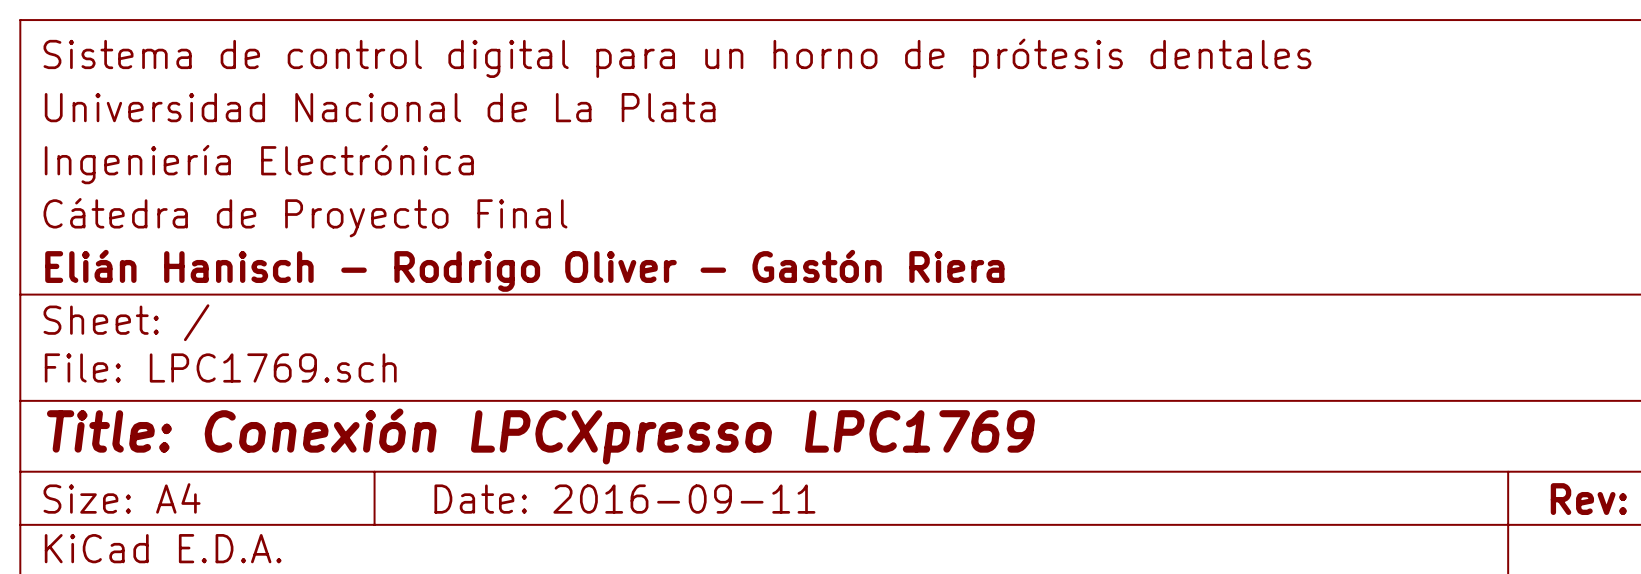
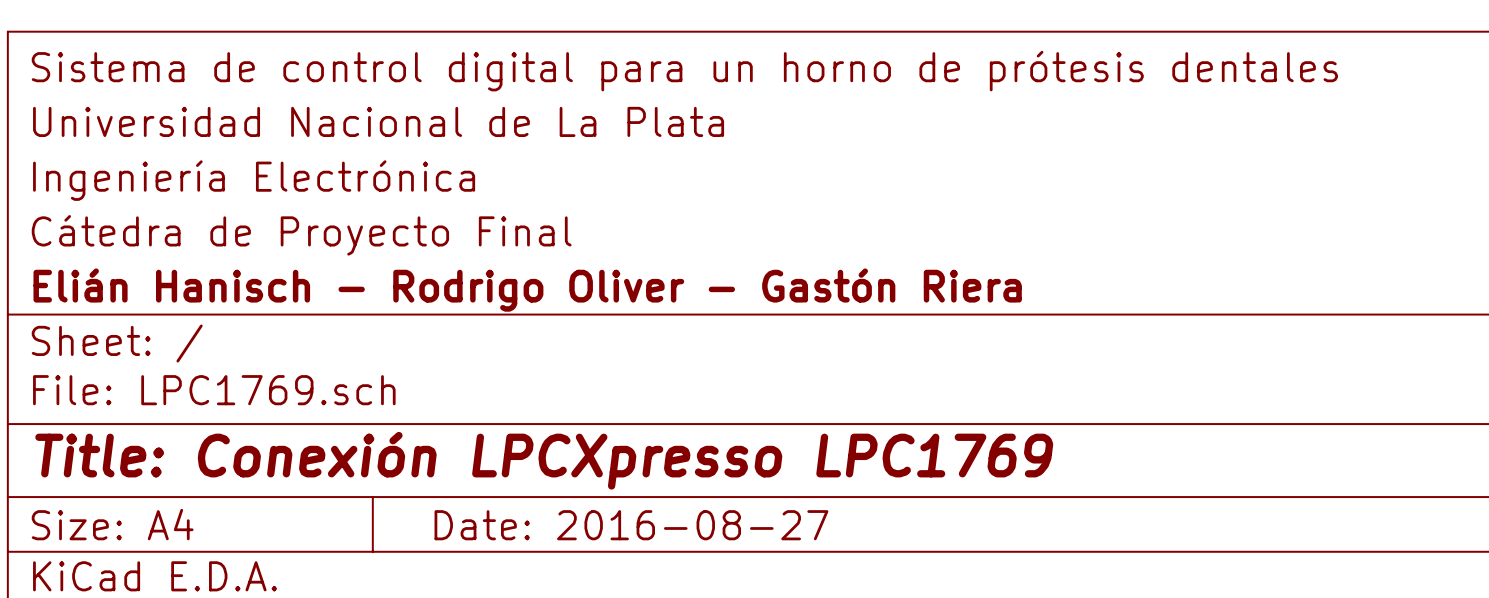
title block: Date: 2016-09-11 (624, 499) -> Date: 2016-08-27 (631, 525)

